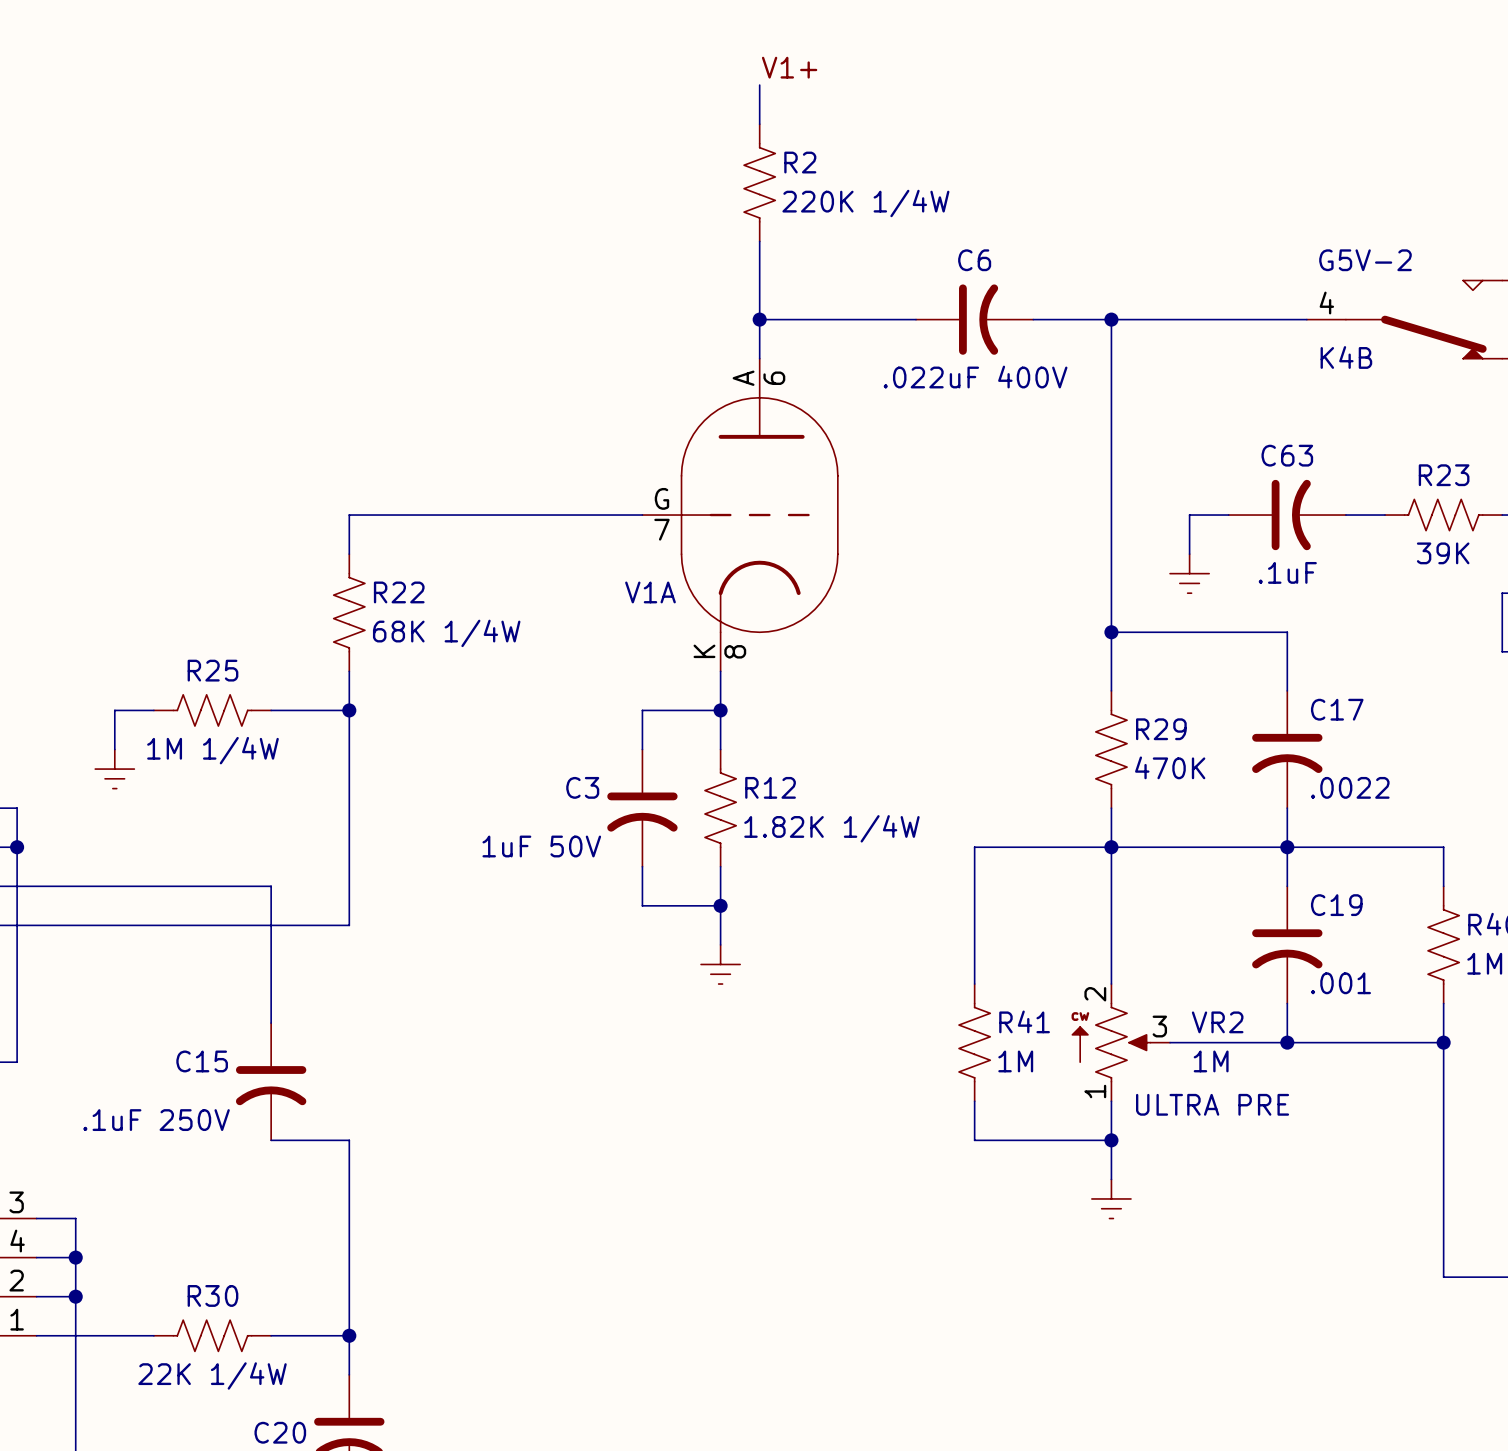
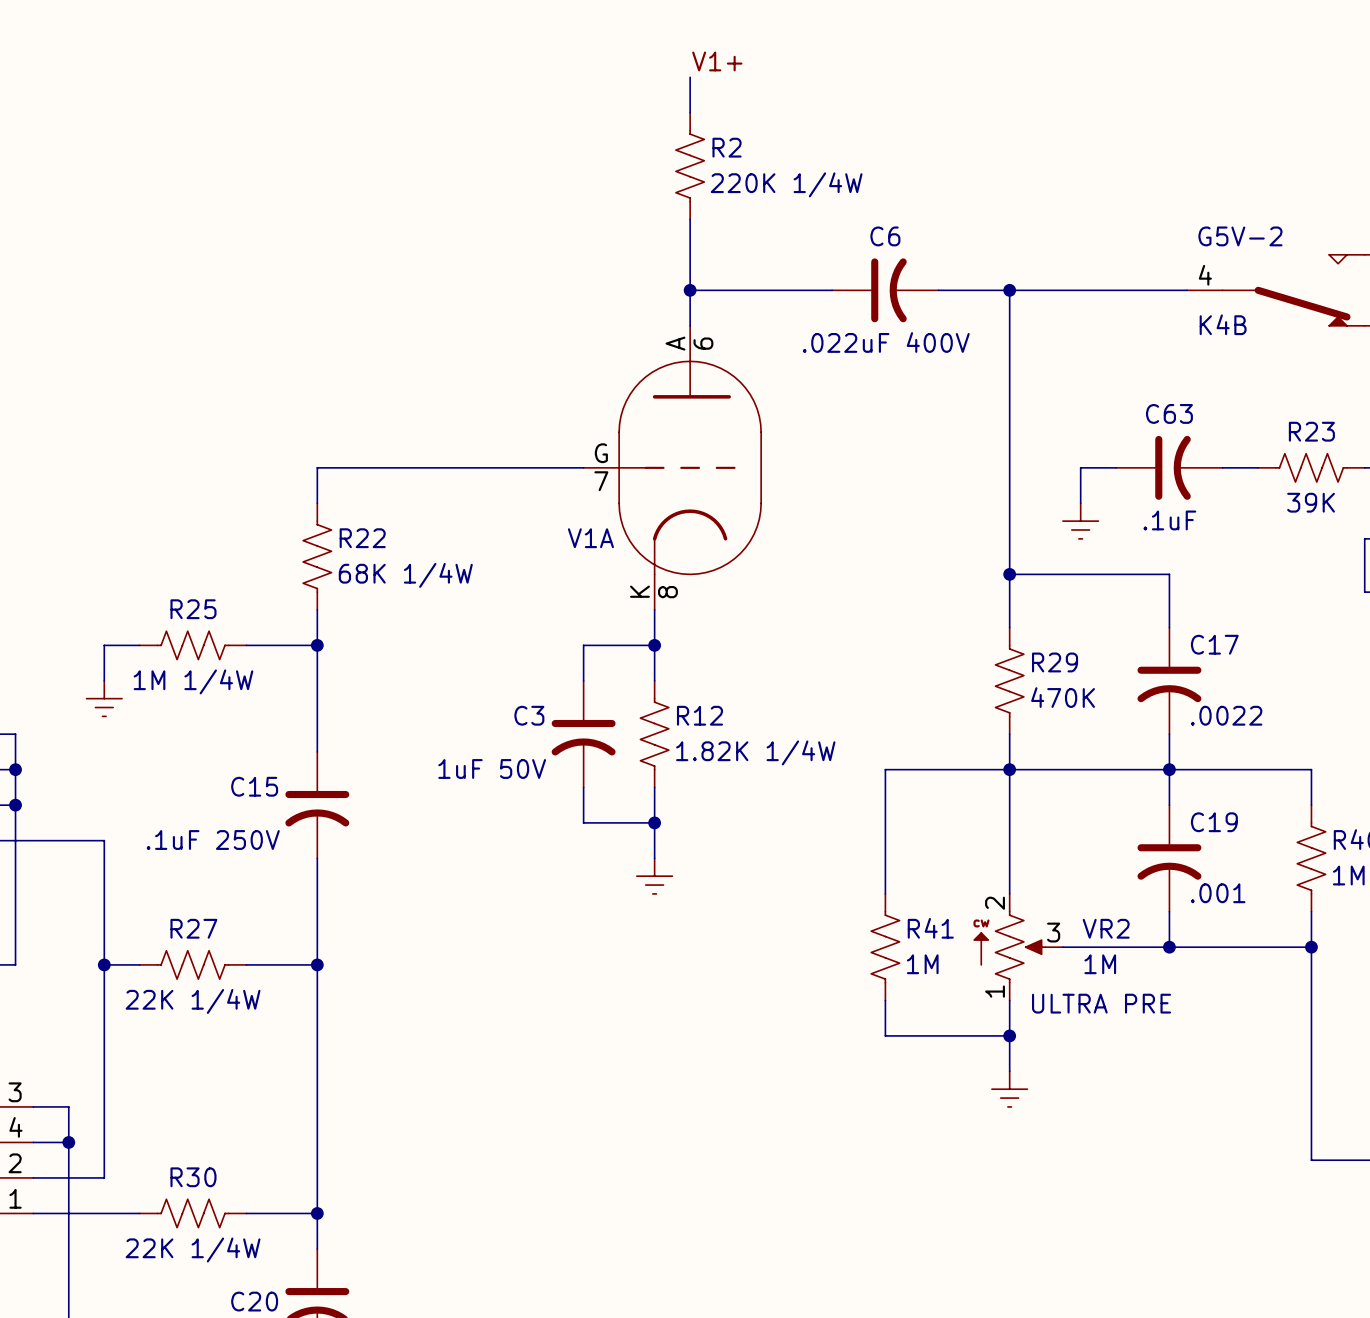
wire: (349, 827) (349, 925) (114, 925) -> (68, 1177) (104, 1177) (104, 840)
wire: (17, 886) (271, 886) (271, 1023) -> none
junction: none -> (15, 805)
wire: none -> (104, 964) (139, 964)
junction: none -> (104, 964)
R27: none -> 22K 1/4W (193, 964)
wire: none -> (246, 964) (317, 964)
junction: none -> (317, 964)
C15 position: (271, 1081) -> (317, 805)
wire: (271, 1140) (349, 1140) -> (317, 858) (317, 1035)
junction: (75, 1296) -> none

